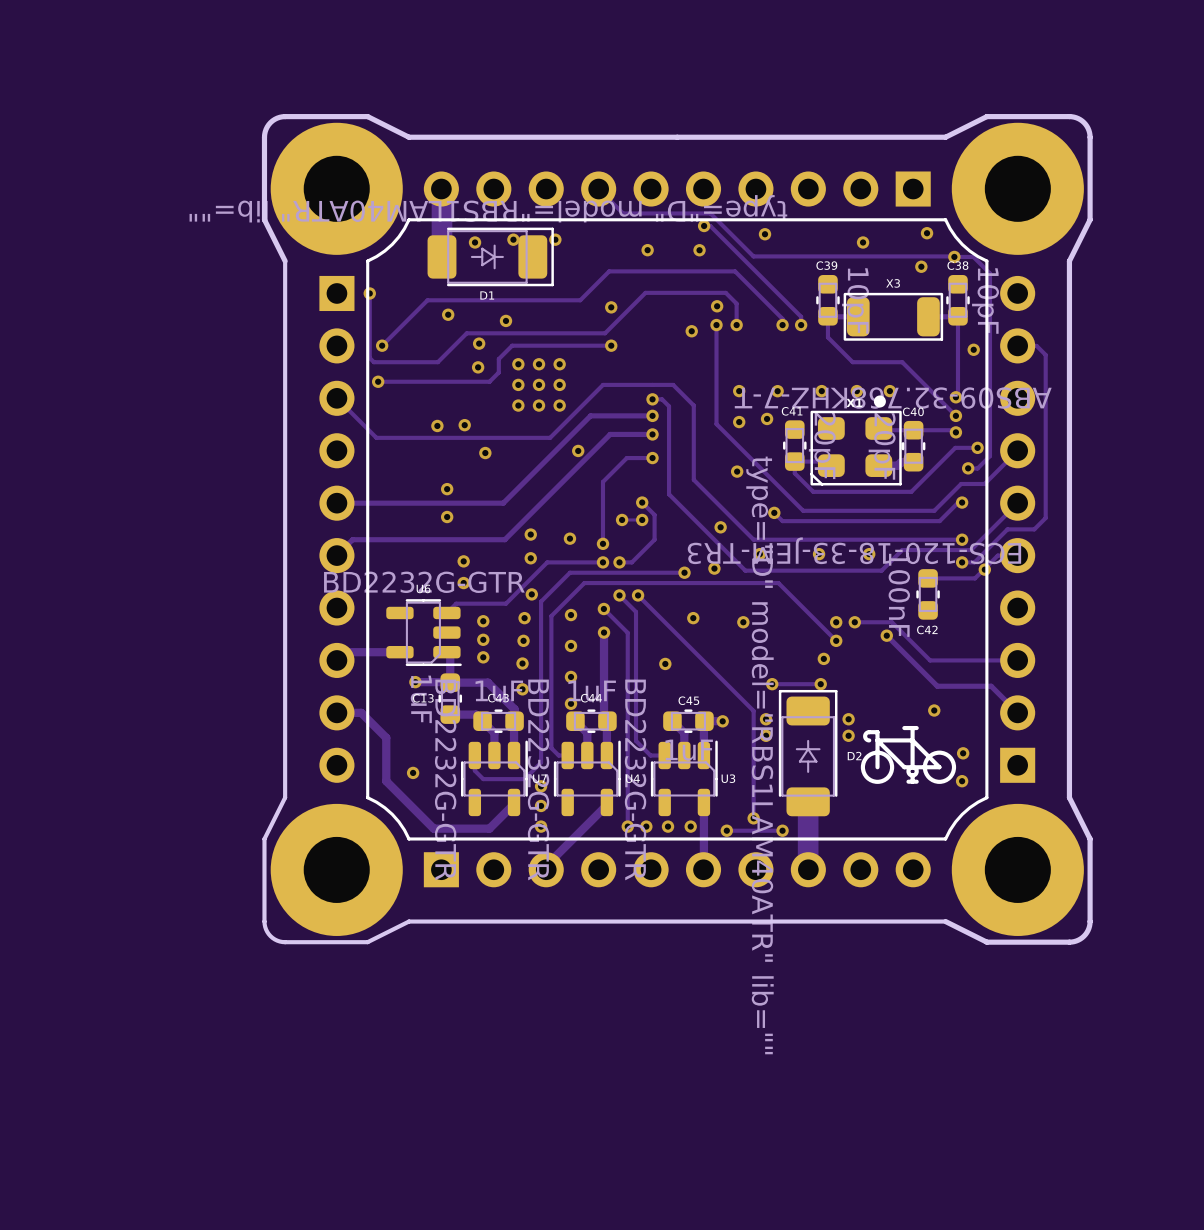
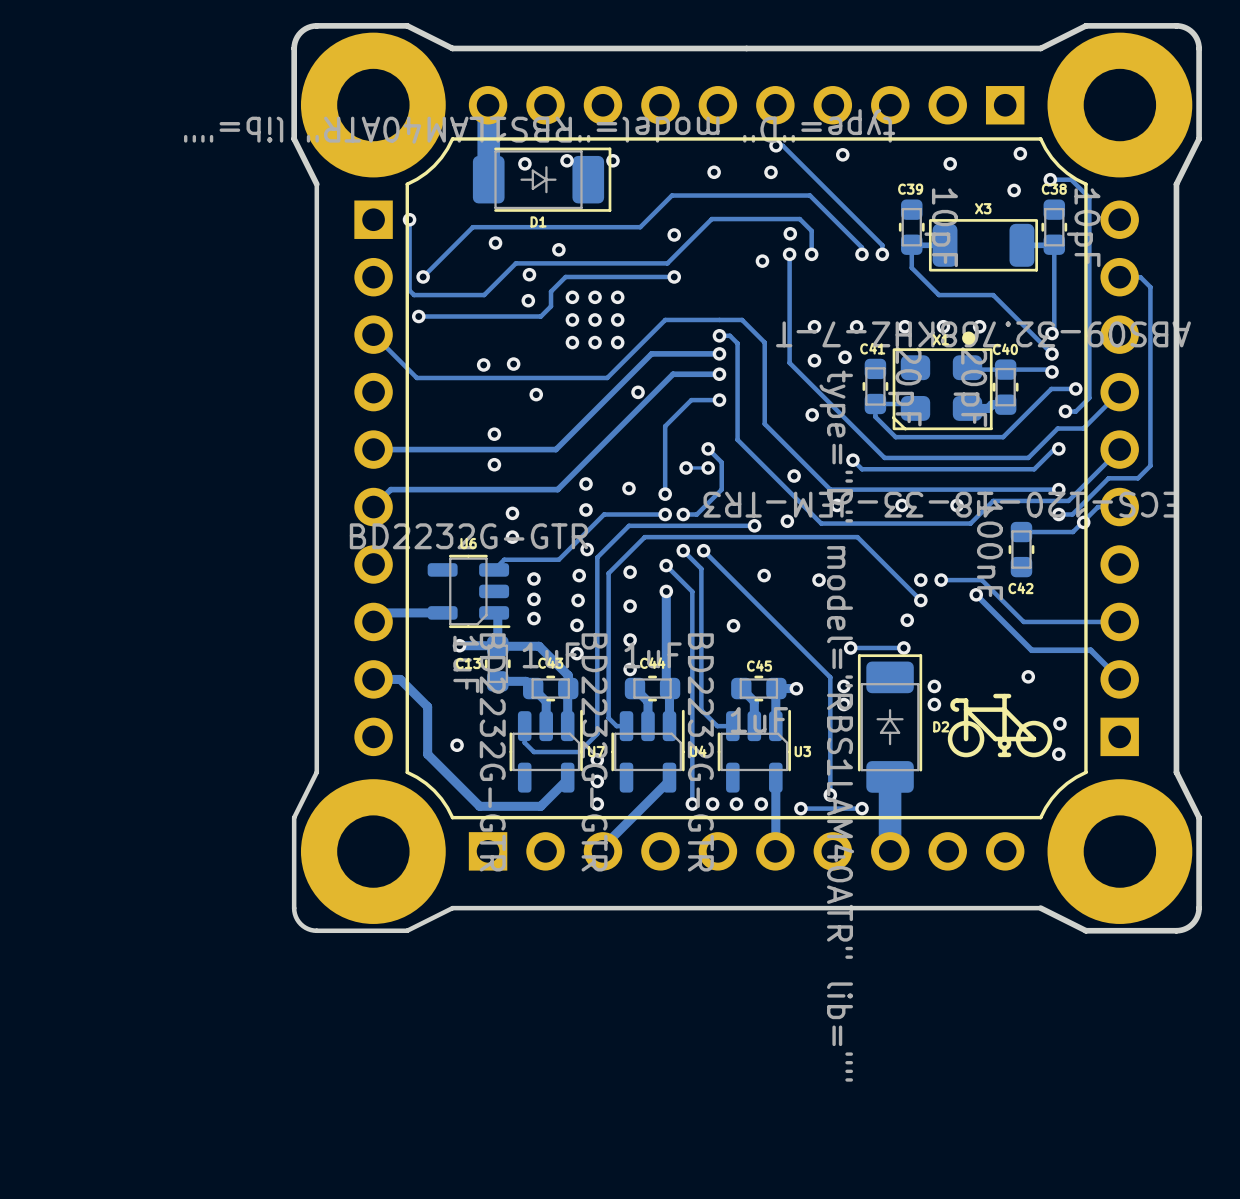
track: (598, 189) (623, 213) (710, 213) (753, 256) (954, 256) -> none
via: (973, 349) -> none

